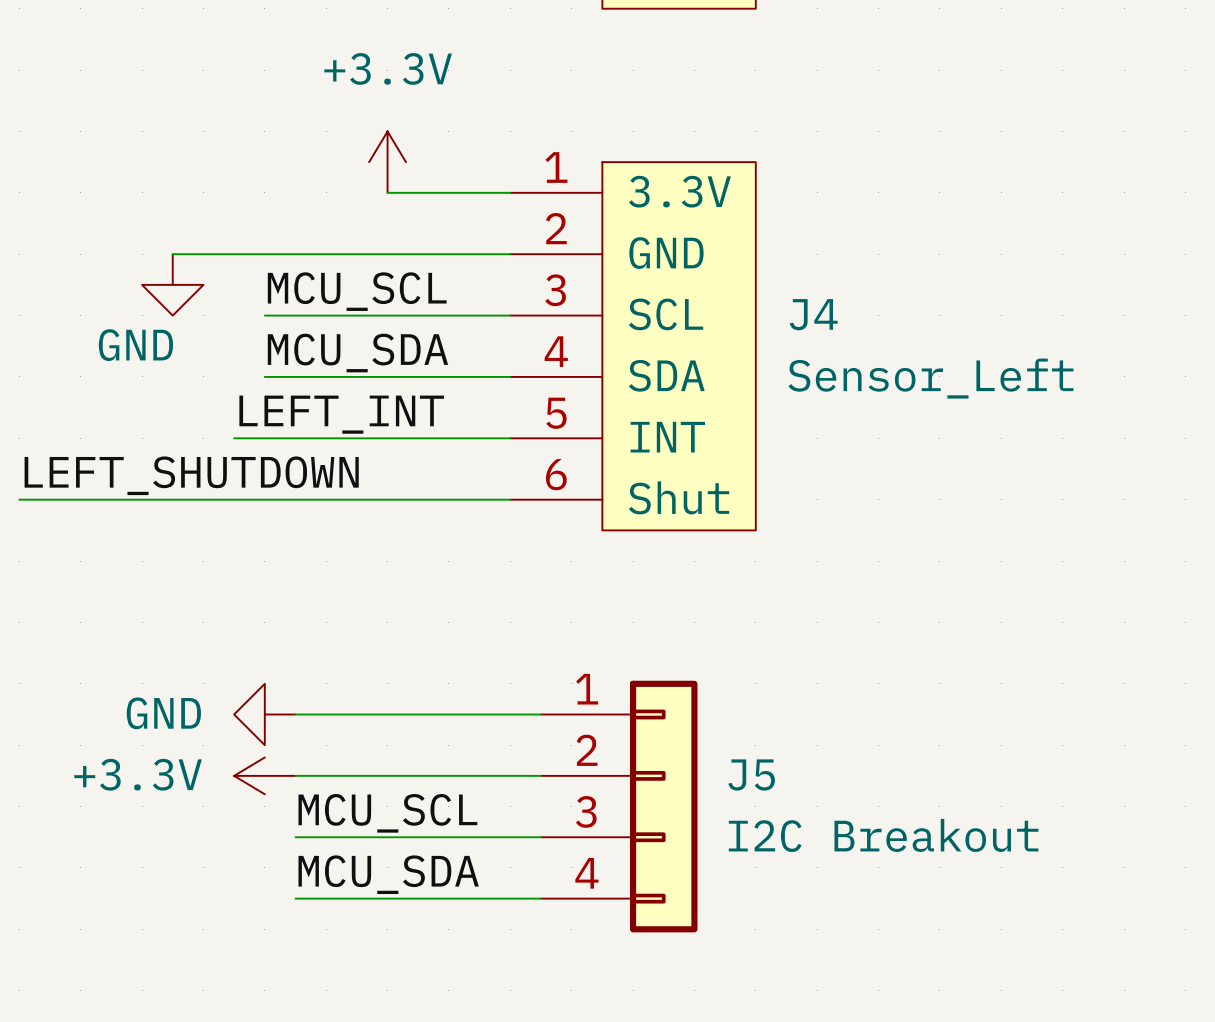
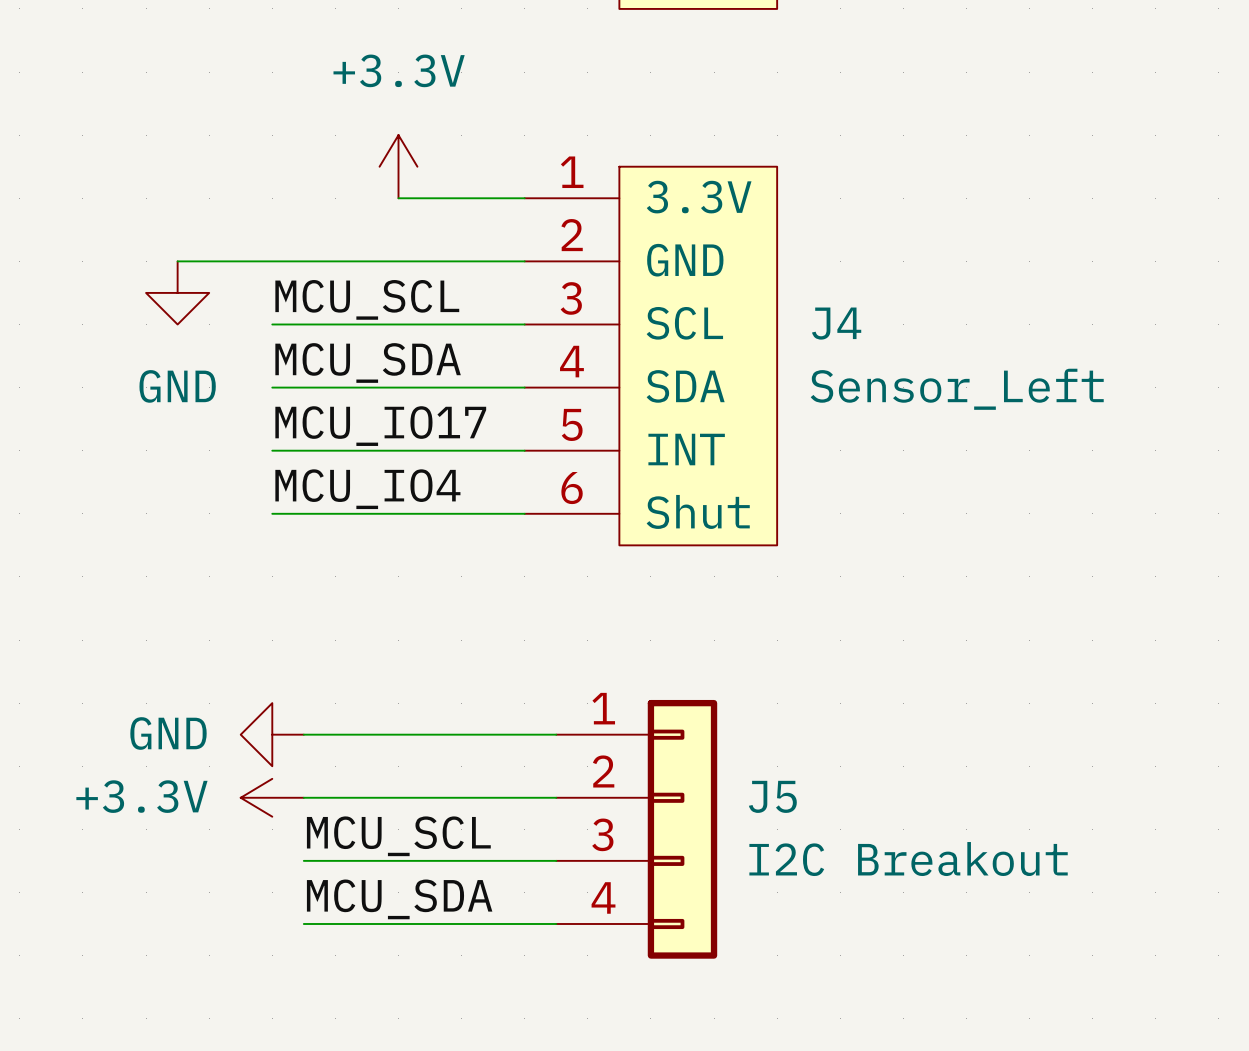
power symbol text position: GND (135, 345) -> GND (177, 386)
label: LEFT_INT (341, 414) -> none
label: none -> MCU_IO17 (380, 426)
wire: (234, 438) (264, 438) -> none
label: LEFT_SHUTDOWN (191, 475) -> none
label: none -> MCU_IO4 (367, 489)
wire: (19, 499) (264, 499) -> none

